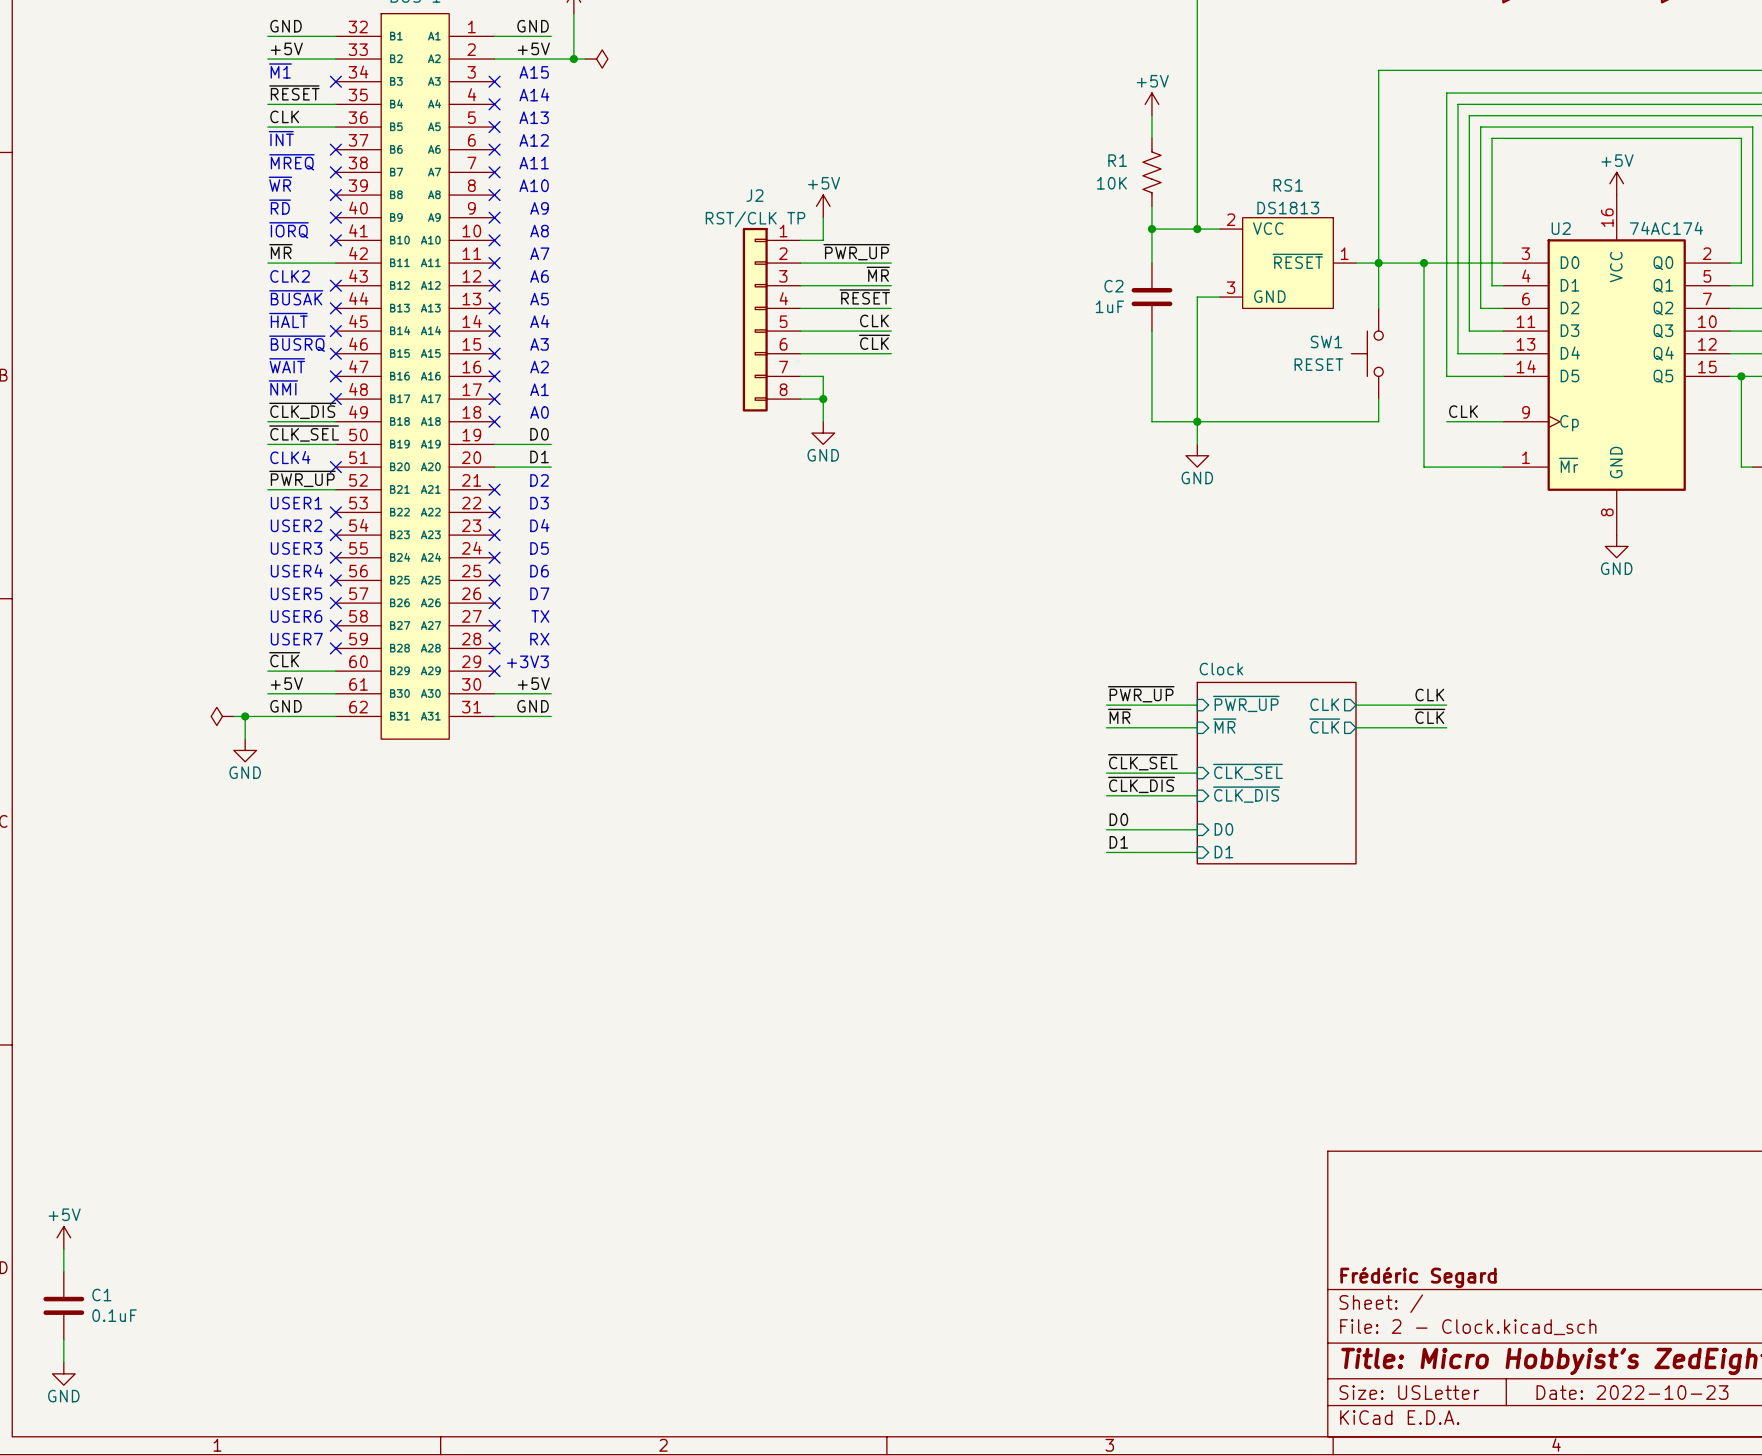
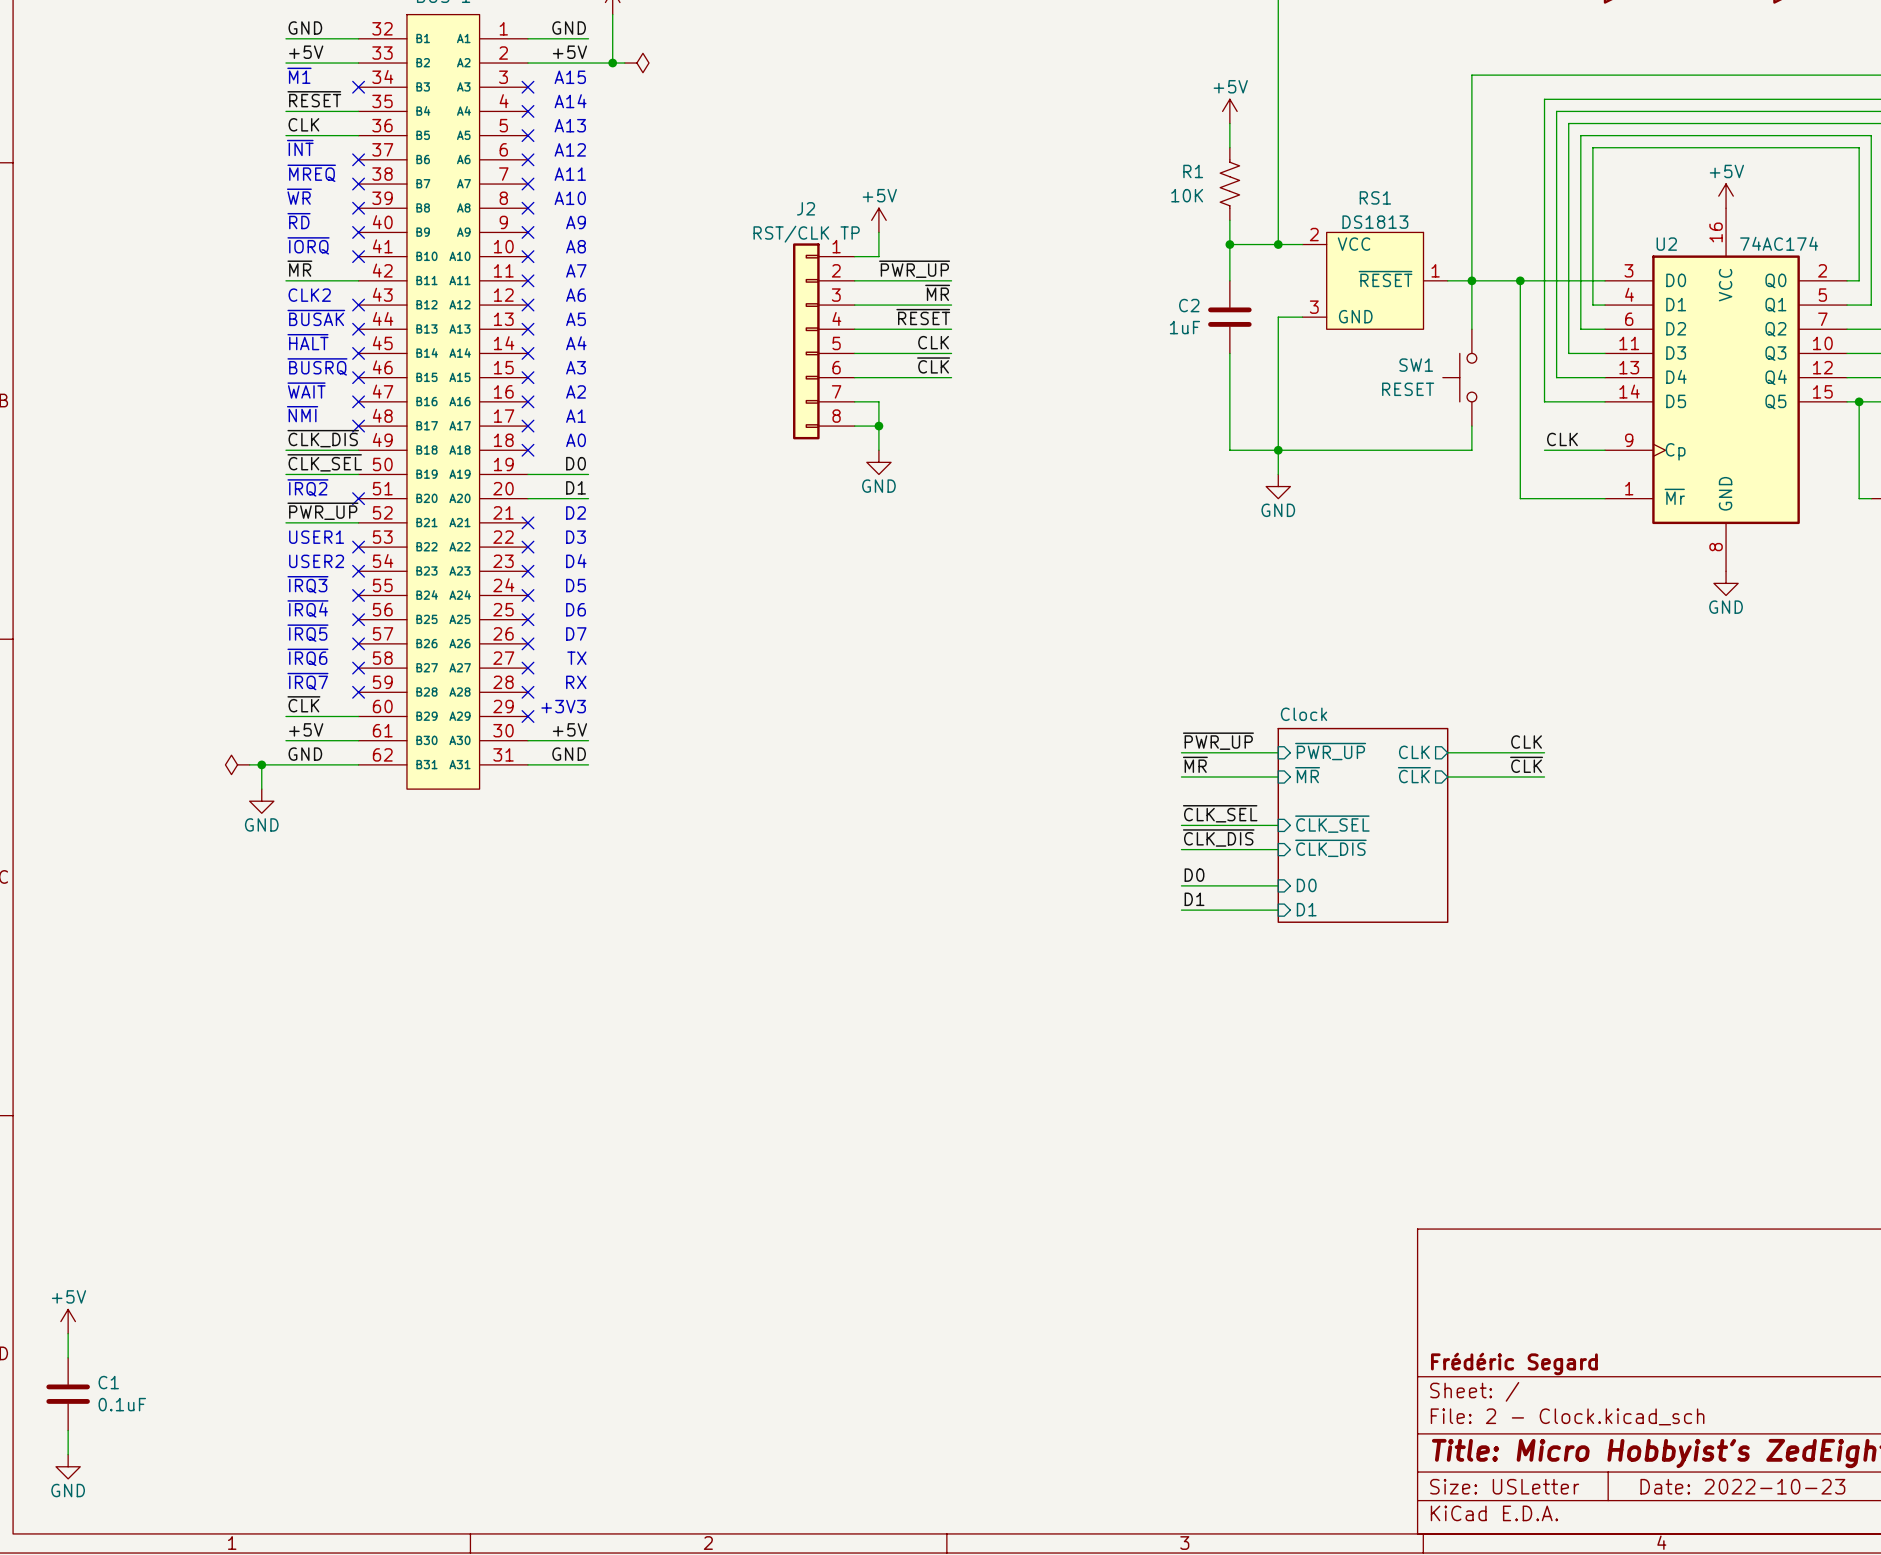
text: CLK4 (290, 457) -> ~{IRQ2} (307, 487)
text: USER3 (296, 548) -> ~{IRQ3} (307, 584)
text: USER4 (296, 570) -> ~{IRQ4} (307, 608)
text: USER5 (296, 593) -> ~{IRQ5} (307, 633)
text: USER6 (296, 616) -> ~{IRQ6} (307, 657)
text: USER7 (296, 639) -> ~{IRQ7} (307, 681)

